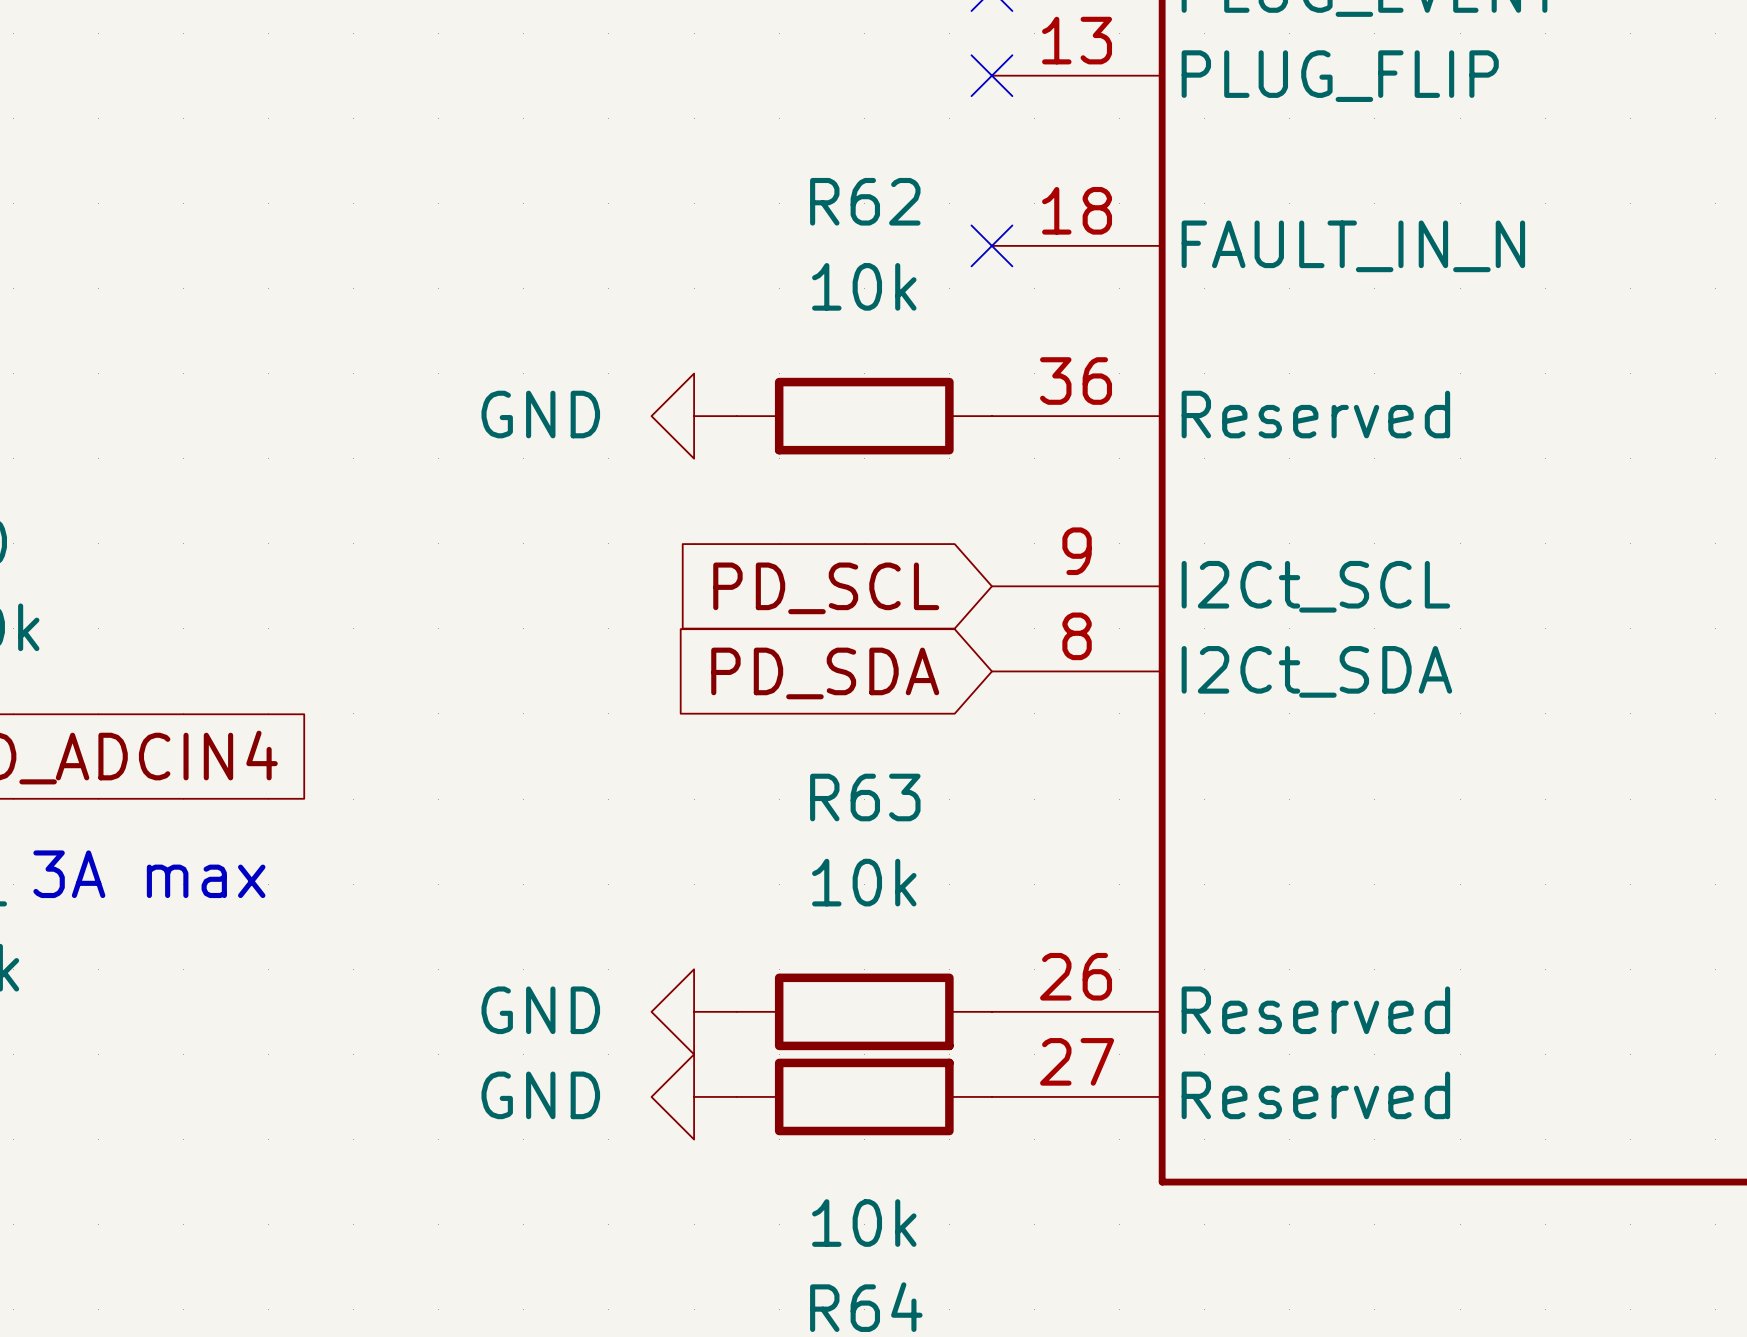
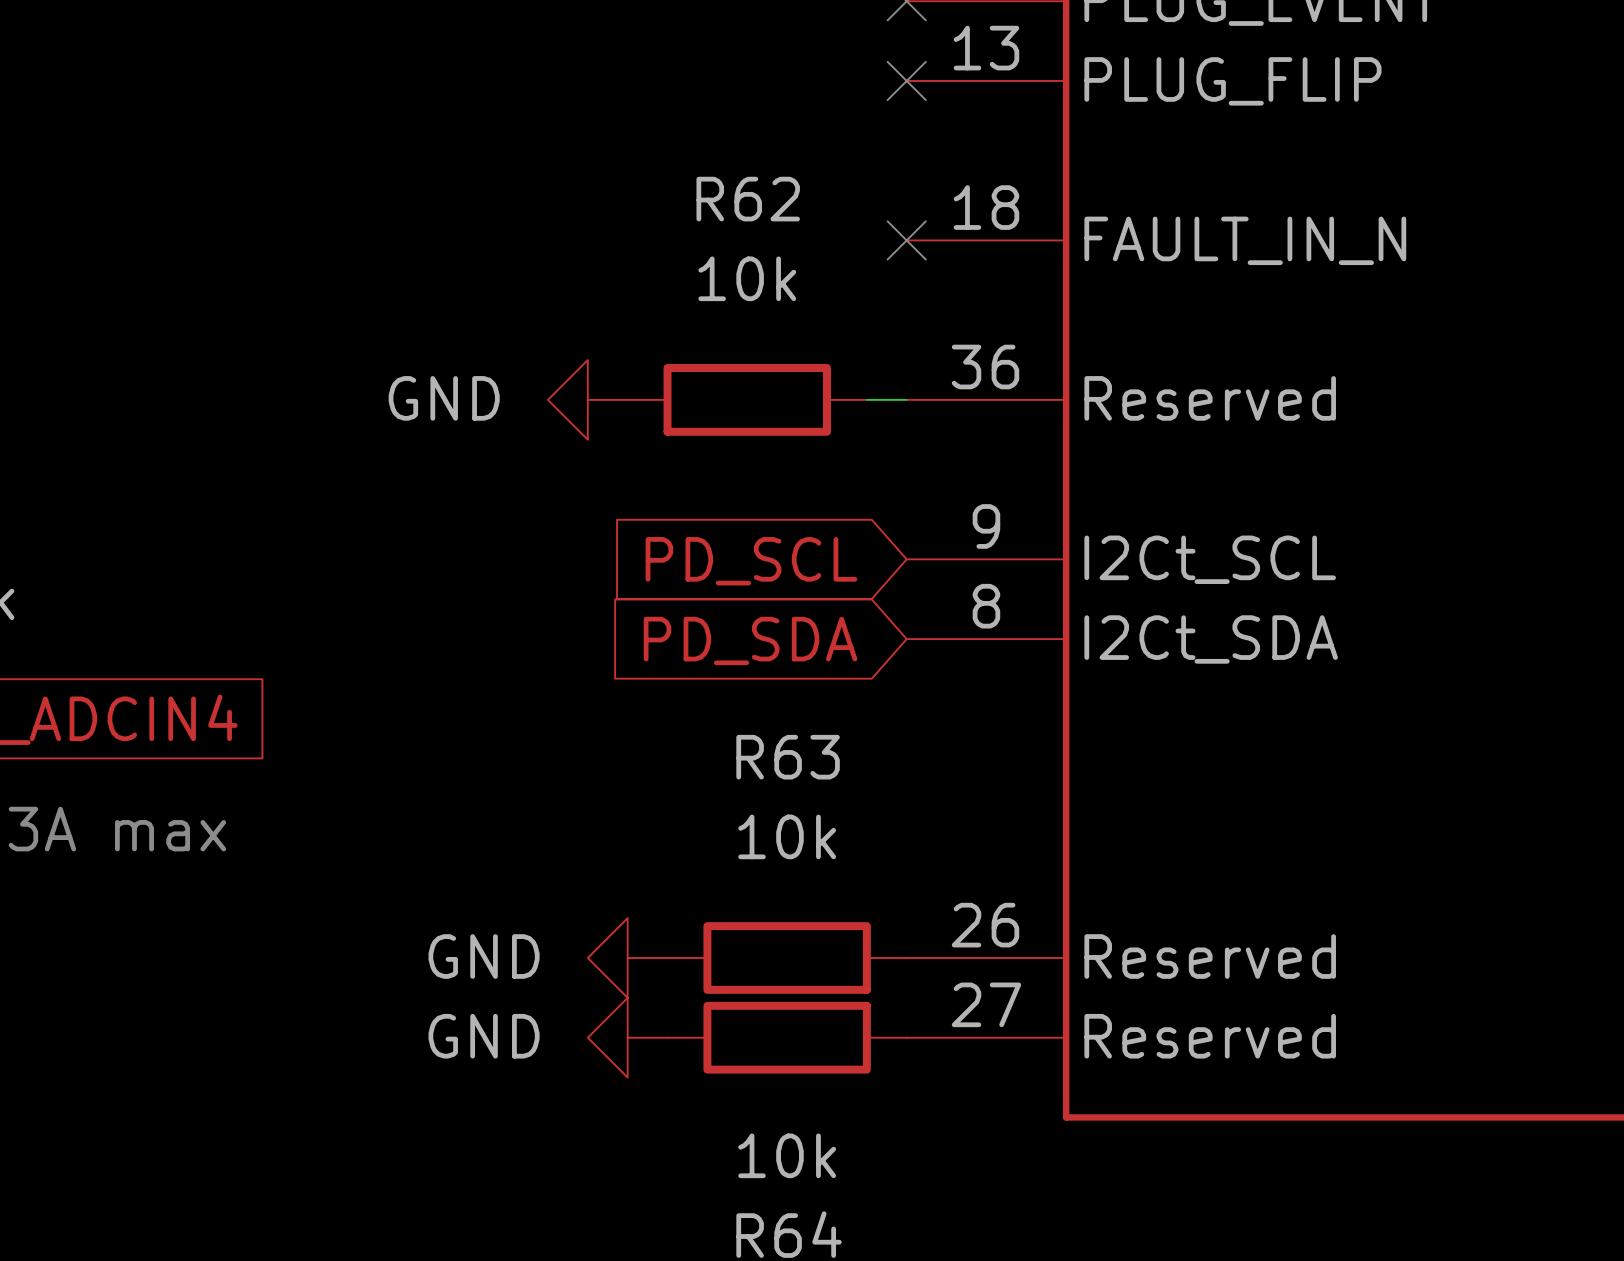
power symbol position: GND (694, 416) -> GND (587, 399)
R62 position: (864, 416) -> (747, 399)

